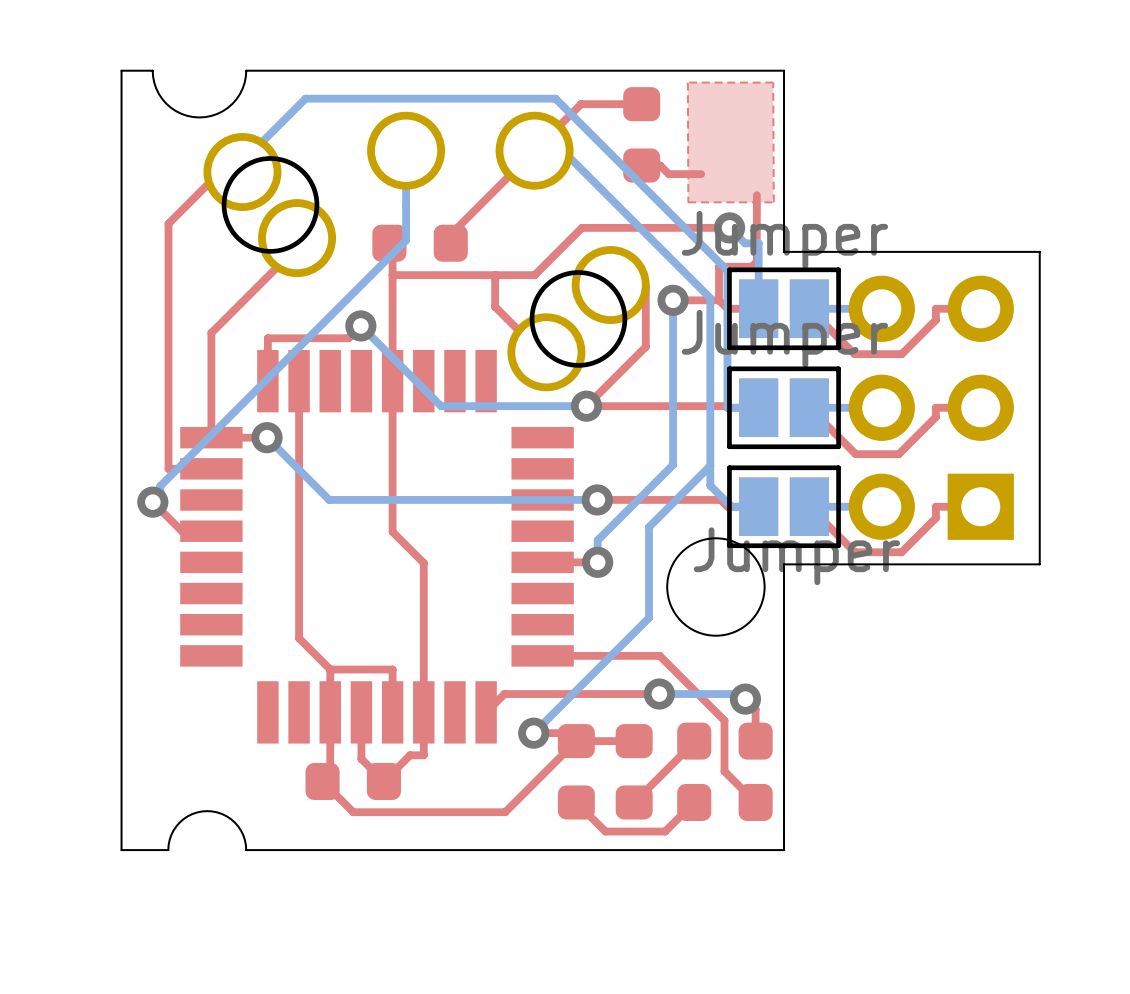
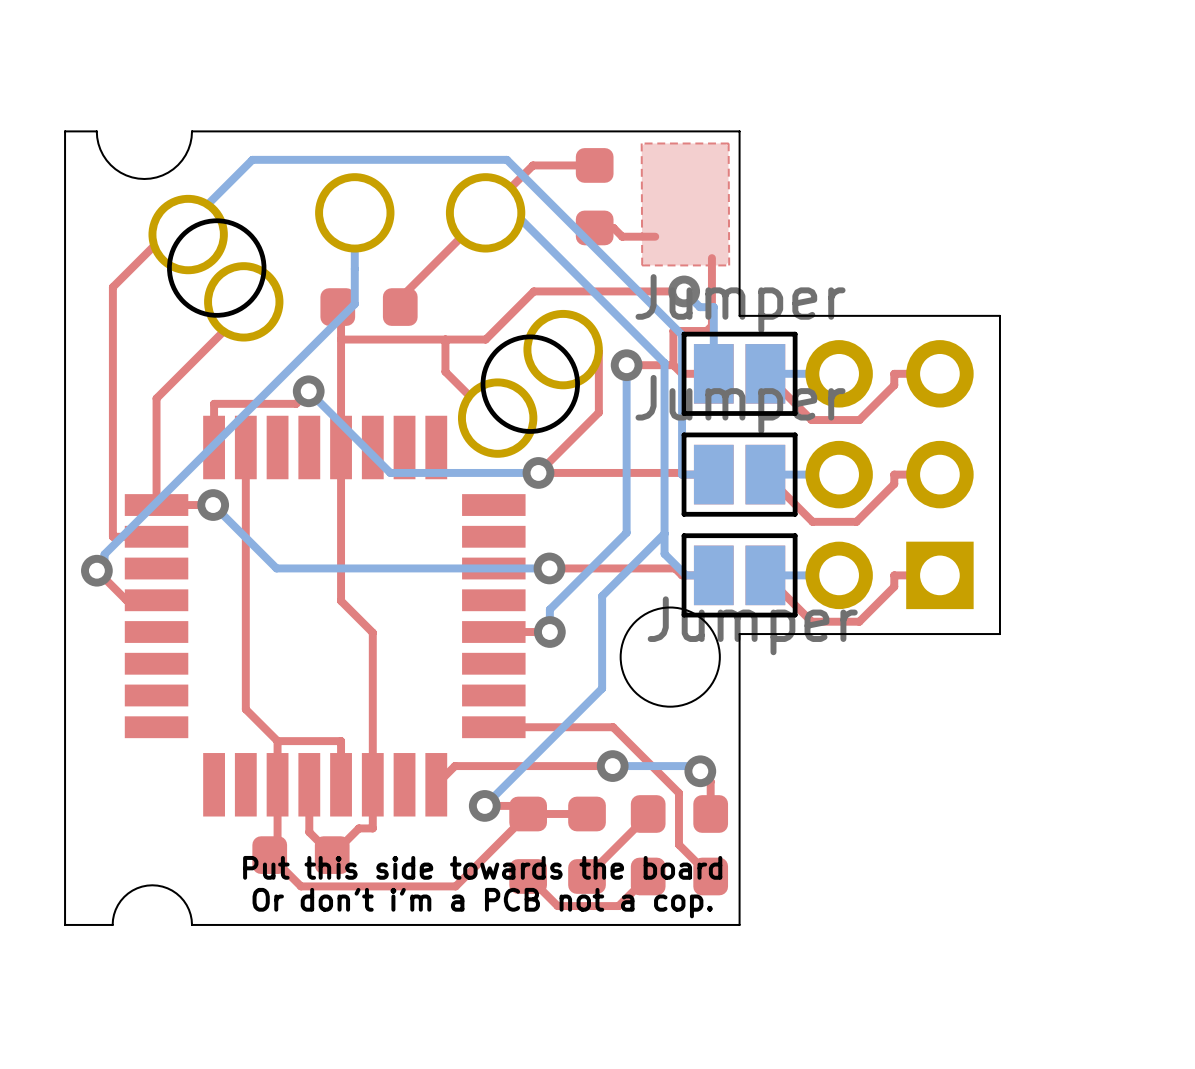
text: none -> Put this side towards the board (482, 867)
text: none -> Or don't i'm a PCB not a cop. (482, 903)

